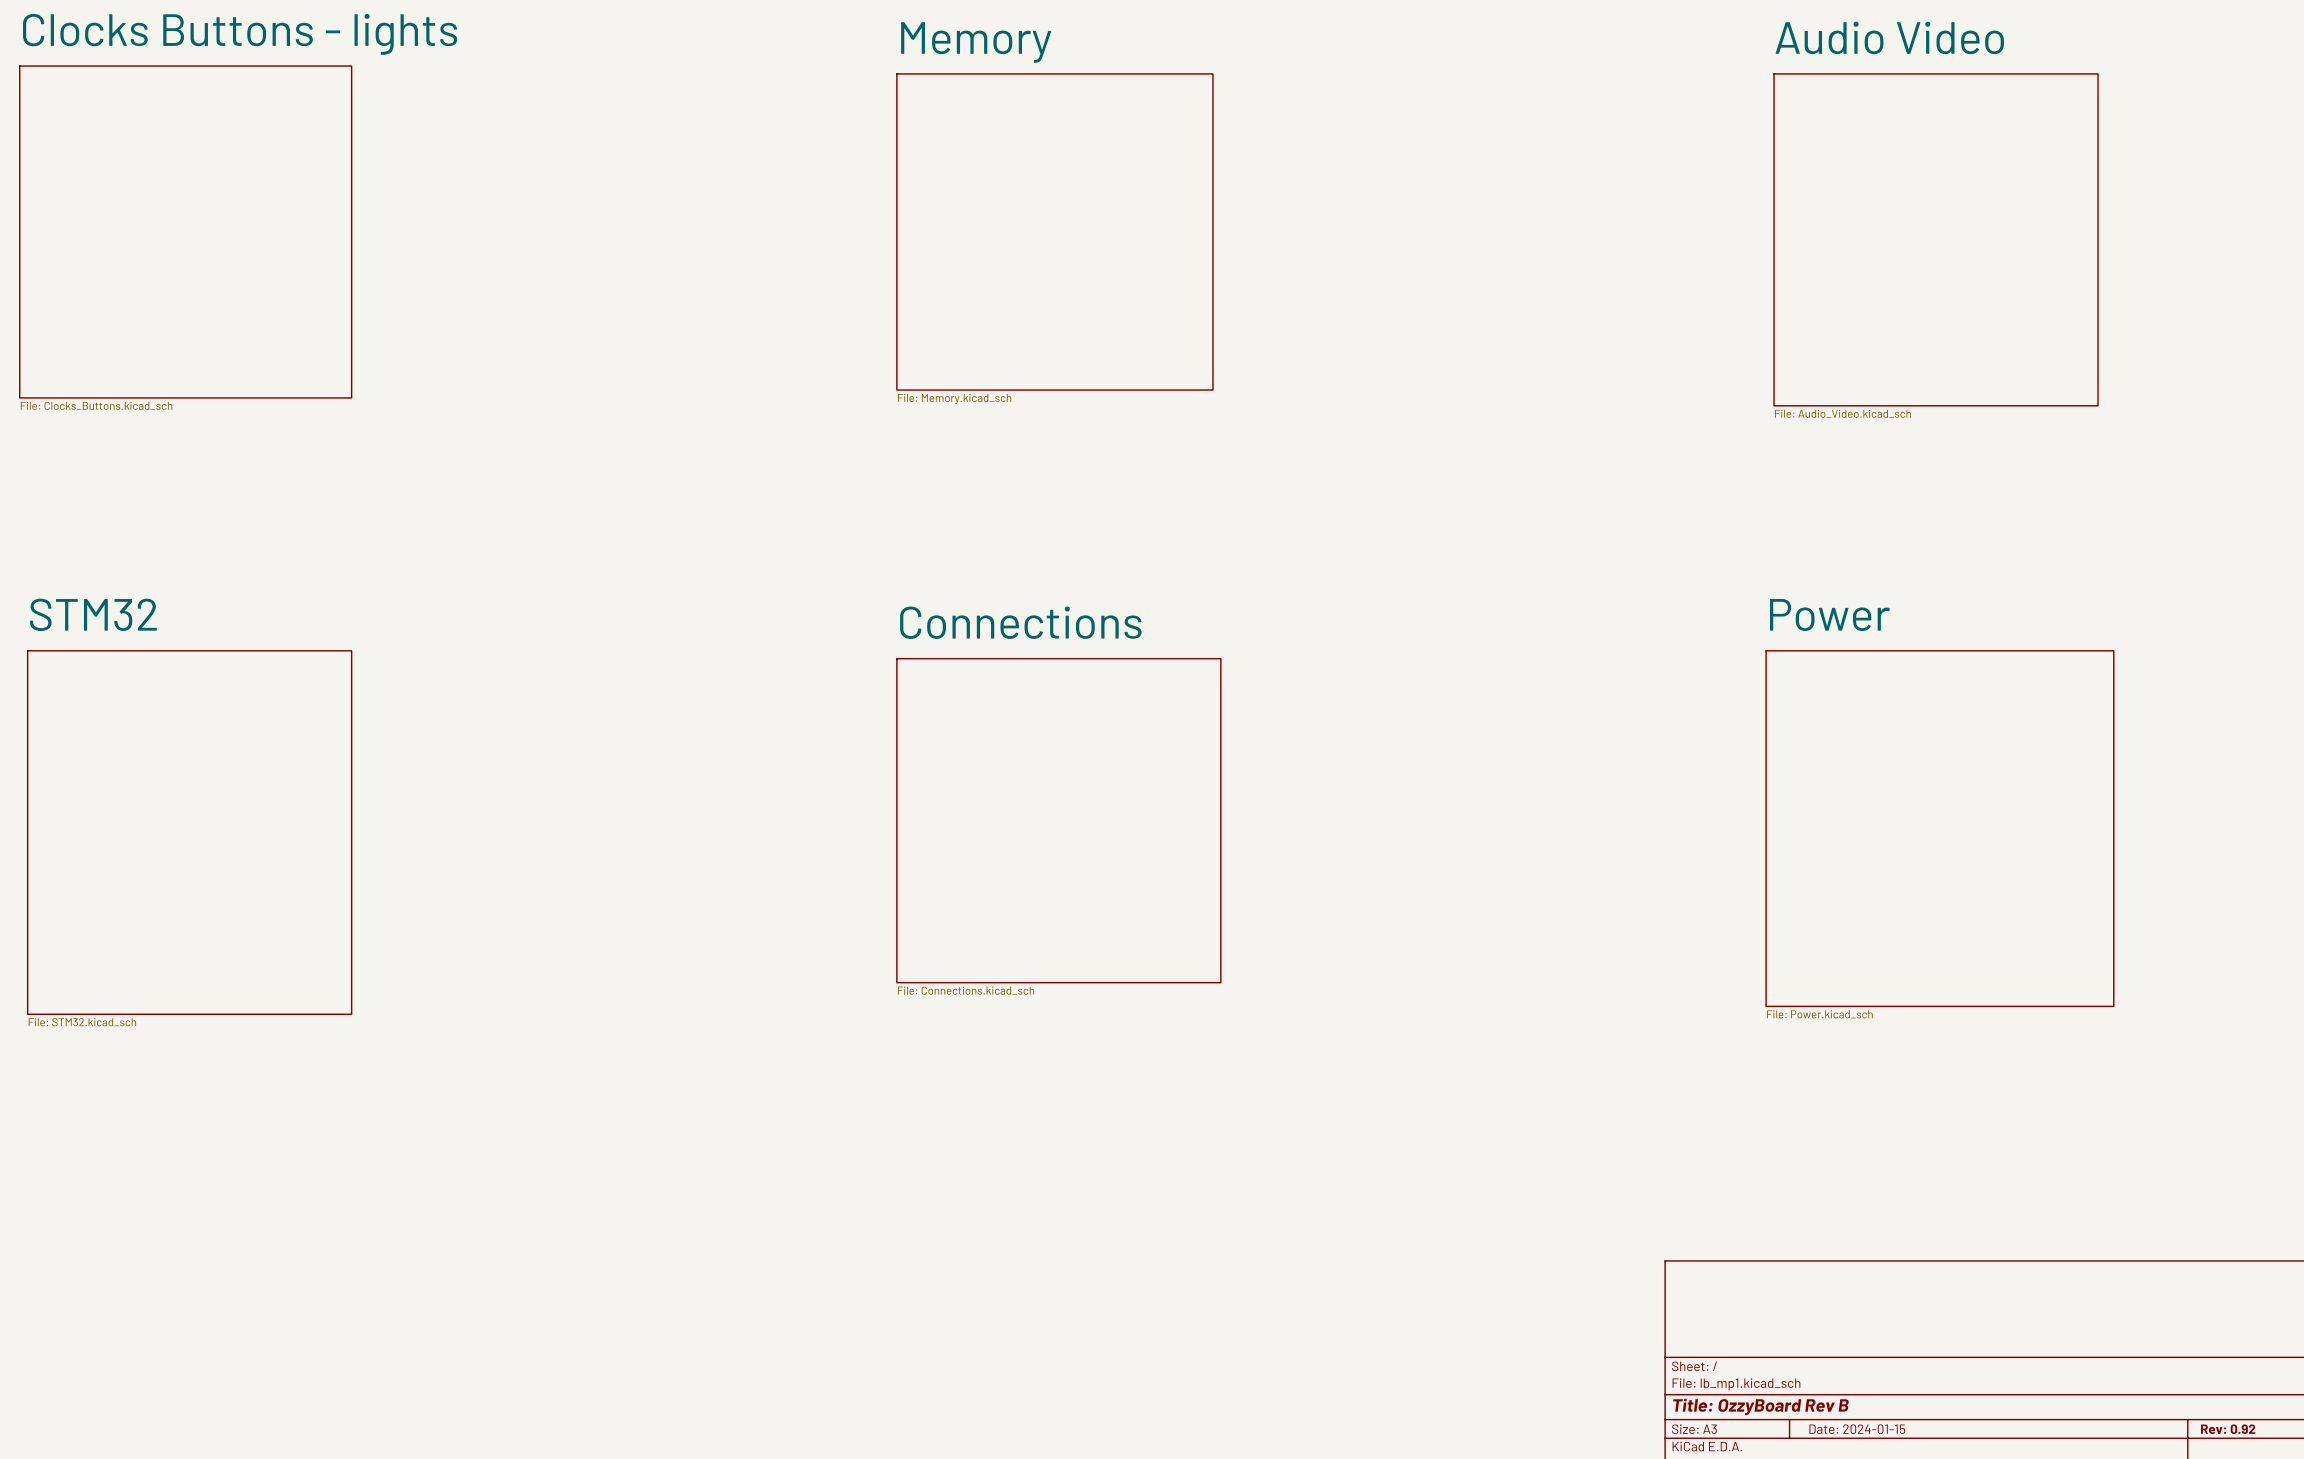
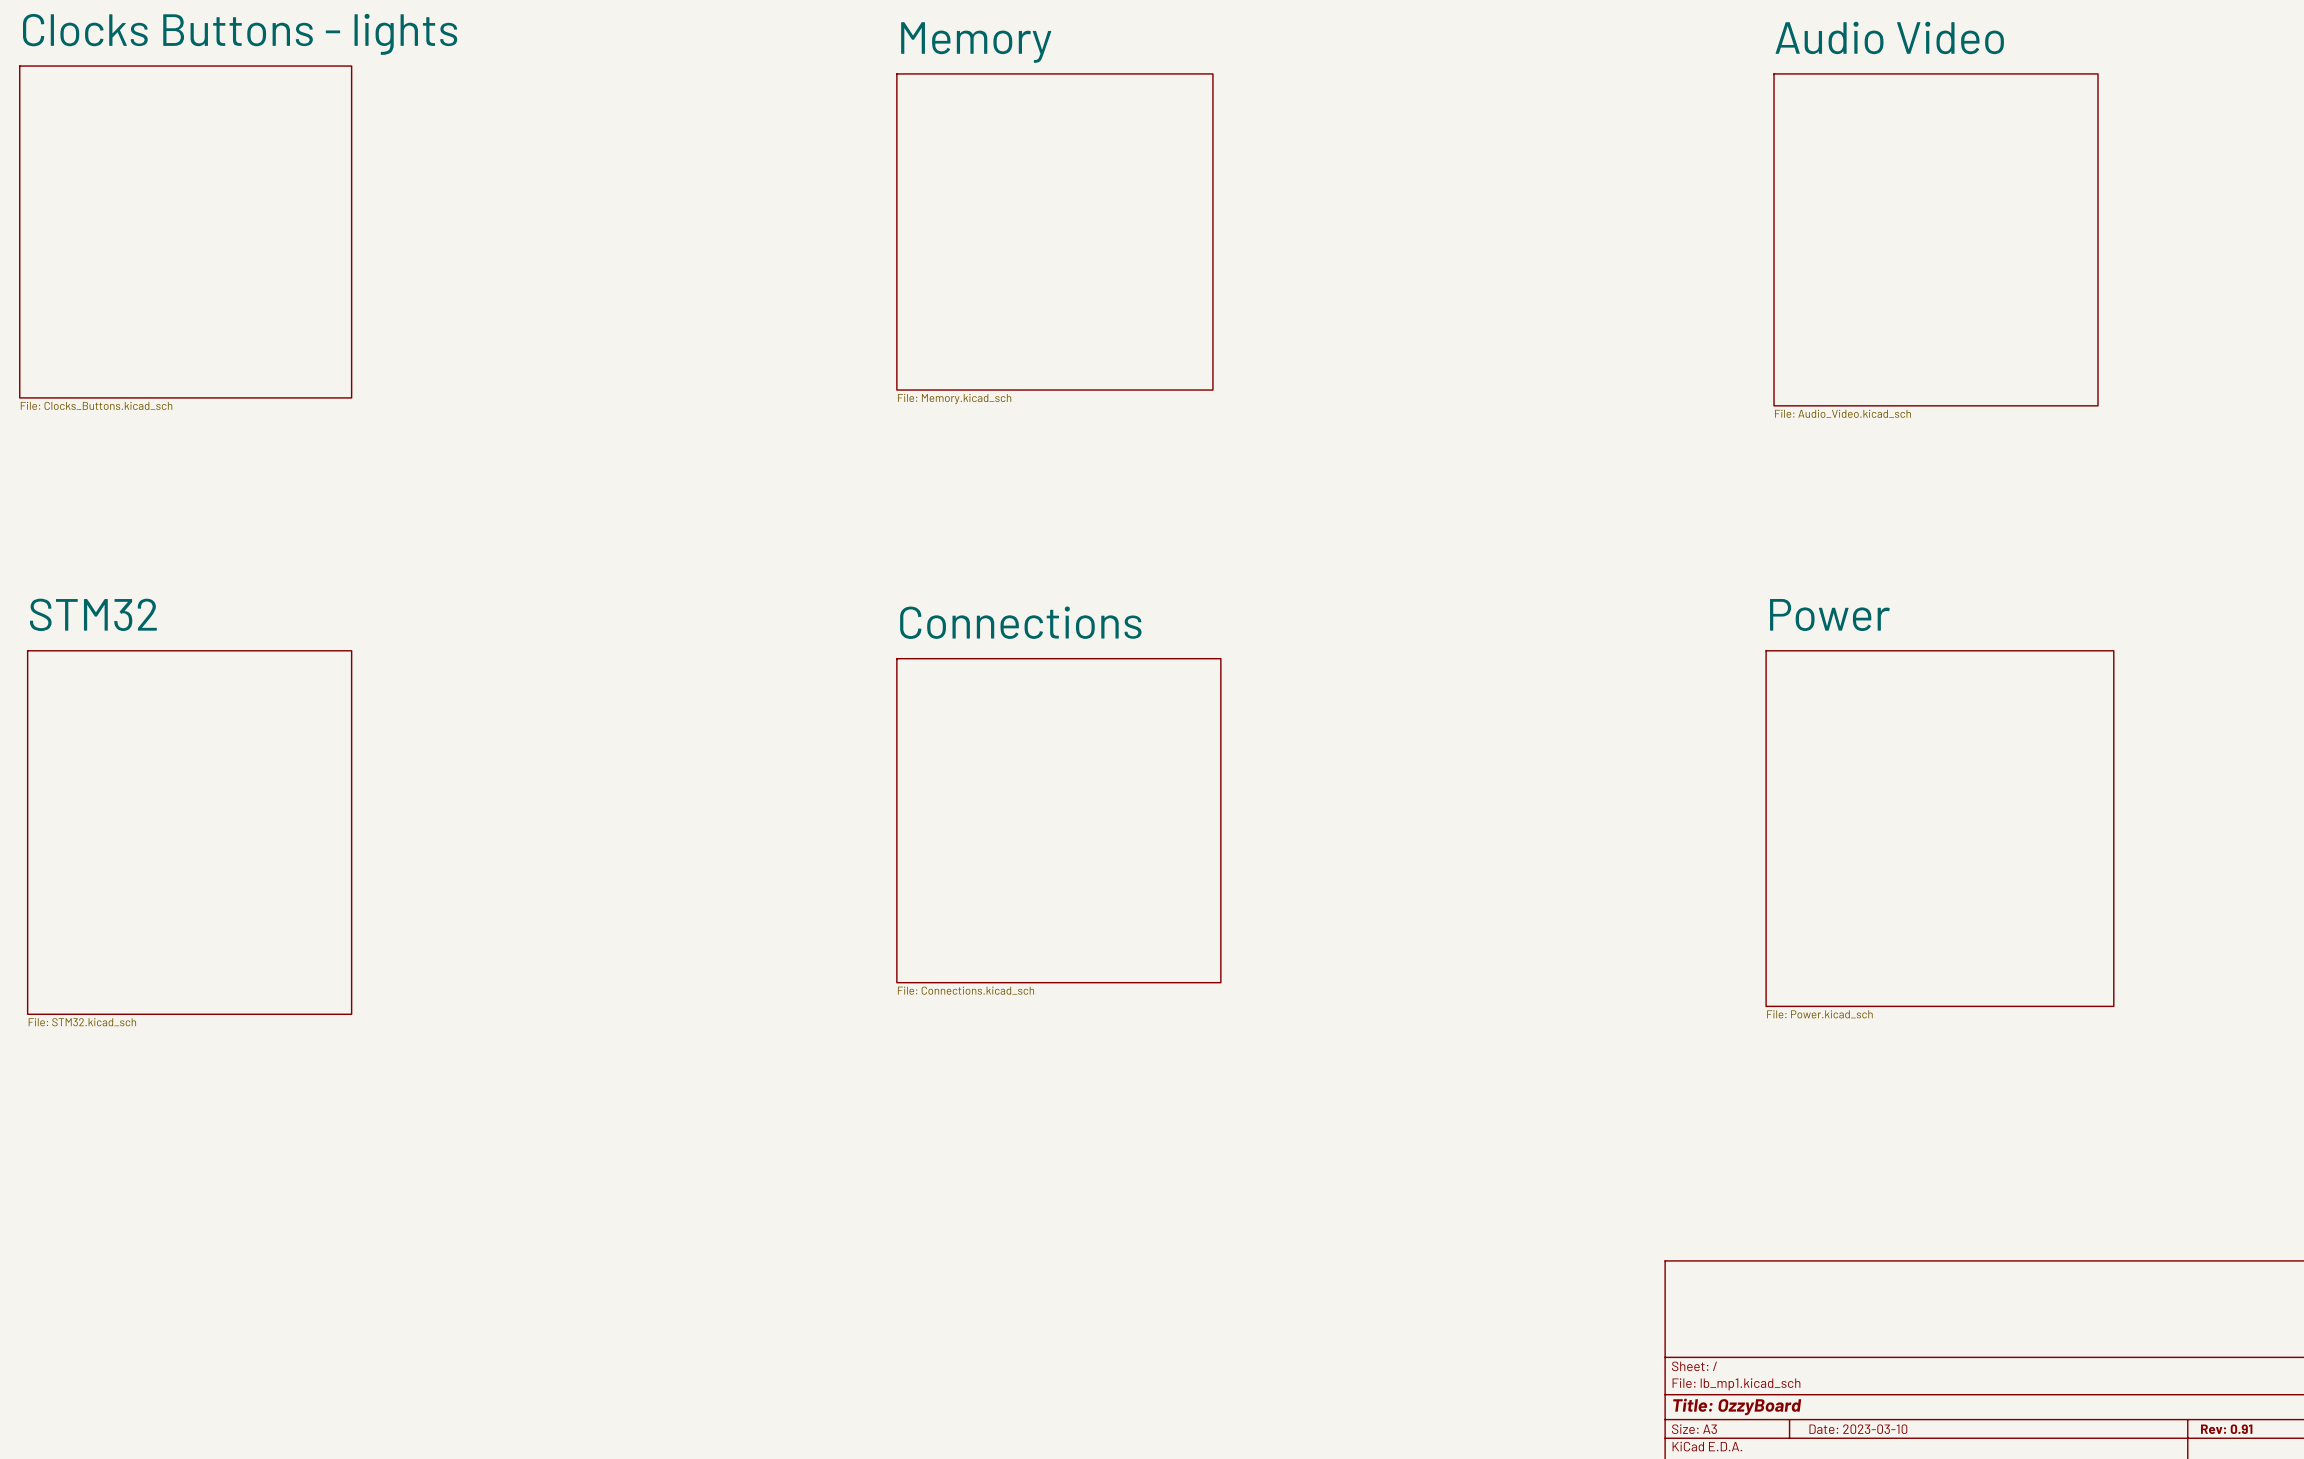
title block: Title: OzzyBoard Rev B (1761, 1406) -> Title: OzzyBoard (1737, 1406)
title block: Date: 2024-01-15 (1857, 1429) -> Date: 2023-03-10 (1858, 1429)
title block: Rev: 0.92 (2228, 1429) -> Rev: 0.91 (2226, 1429)

